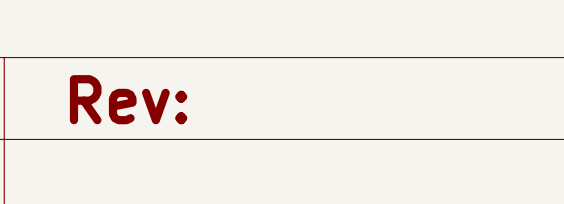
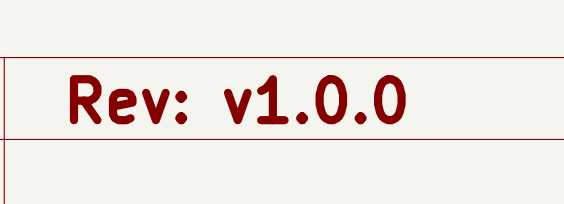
title block: Rev: (128, 99) -> Rev: v1.0.0 (237, 99)

